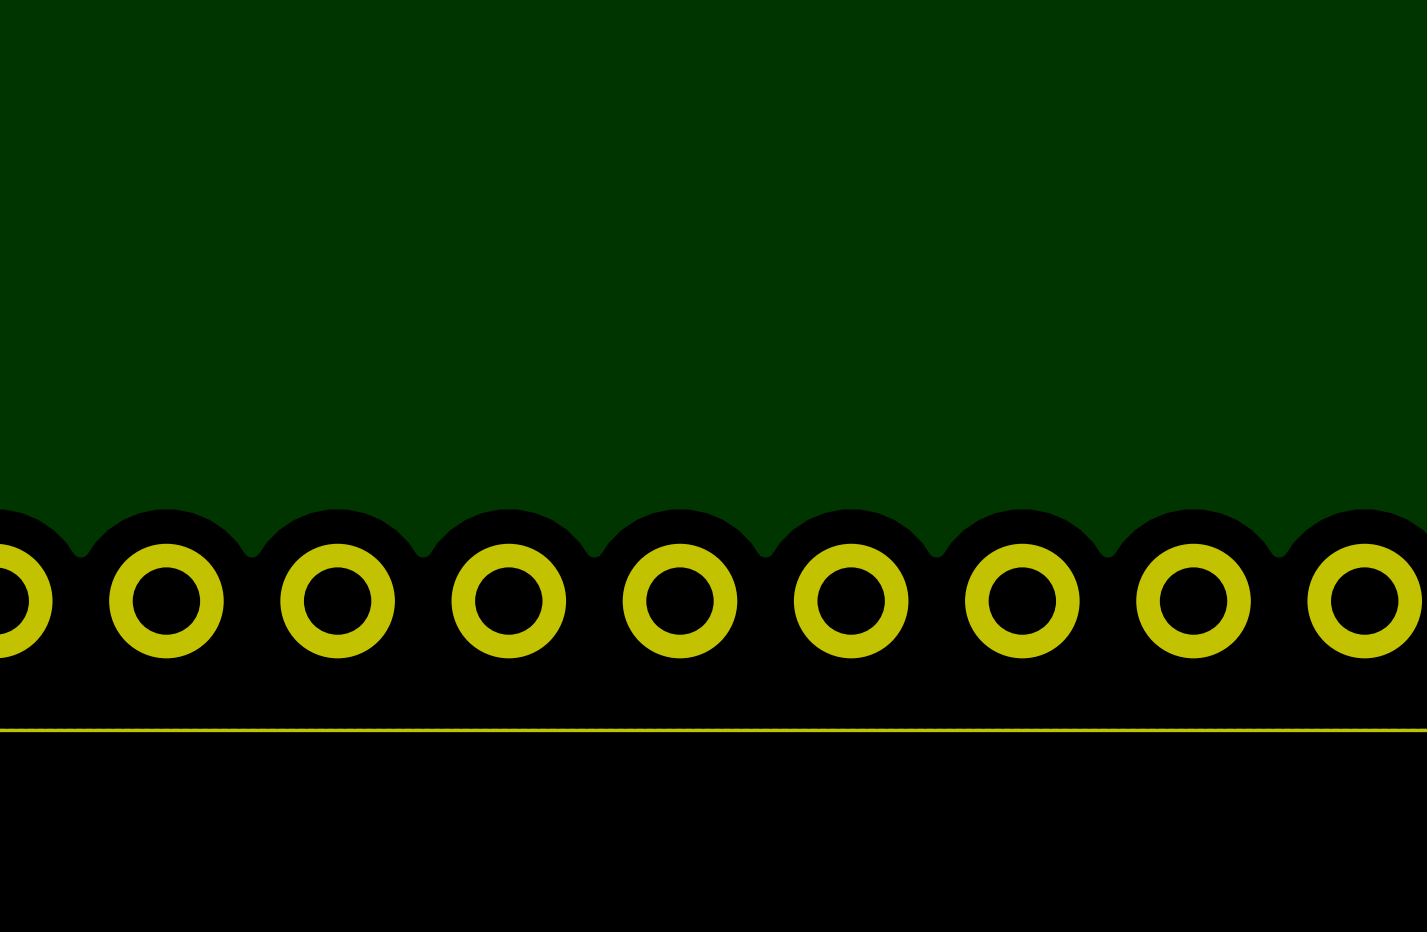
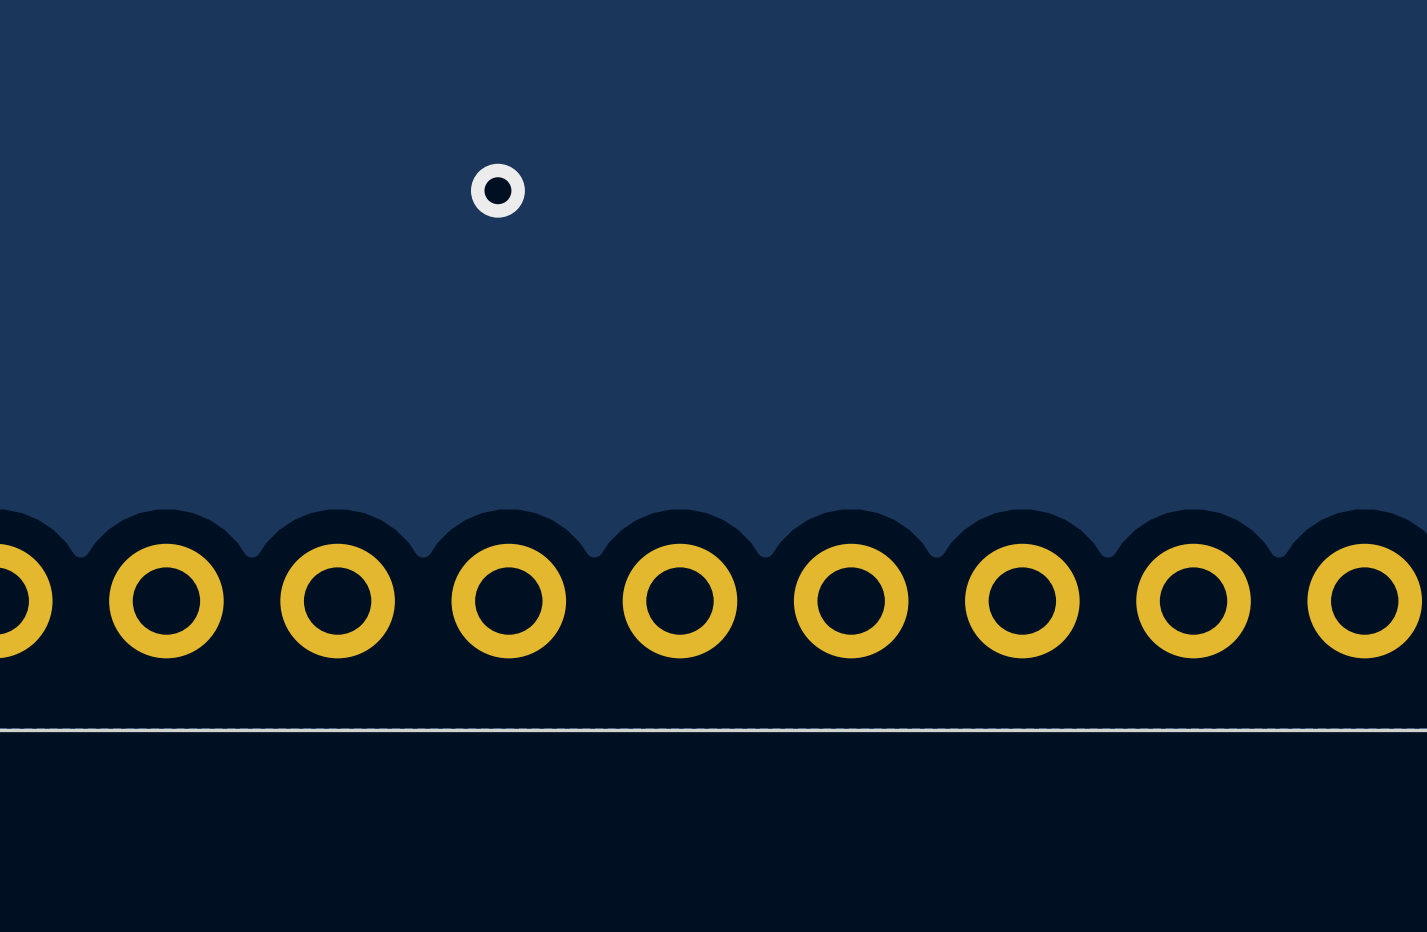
via: none -> (497, 190)

